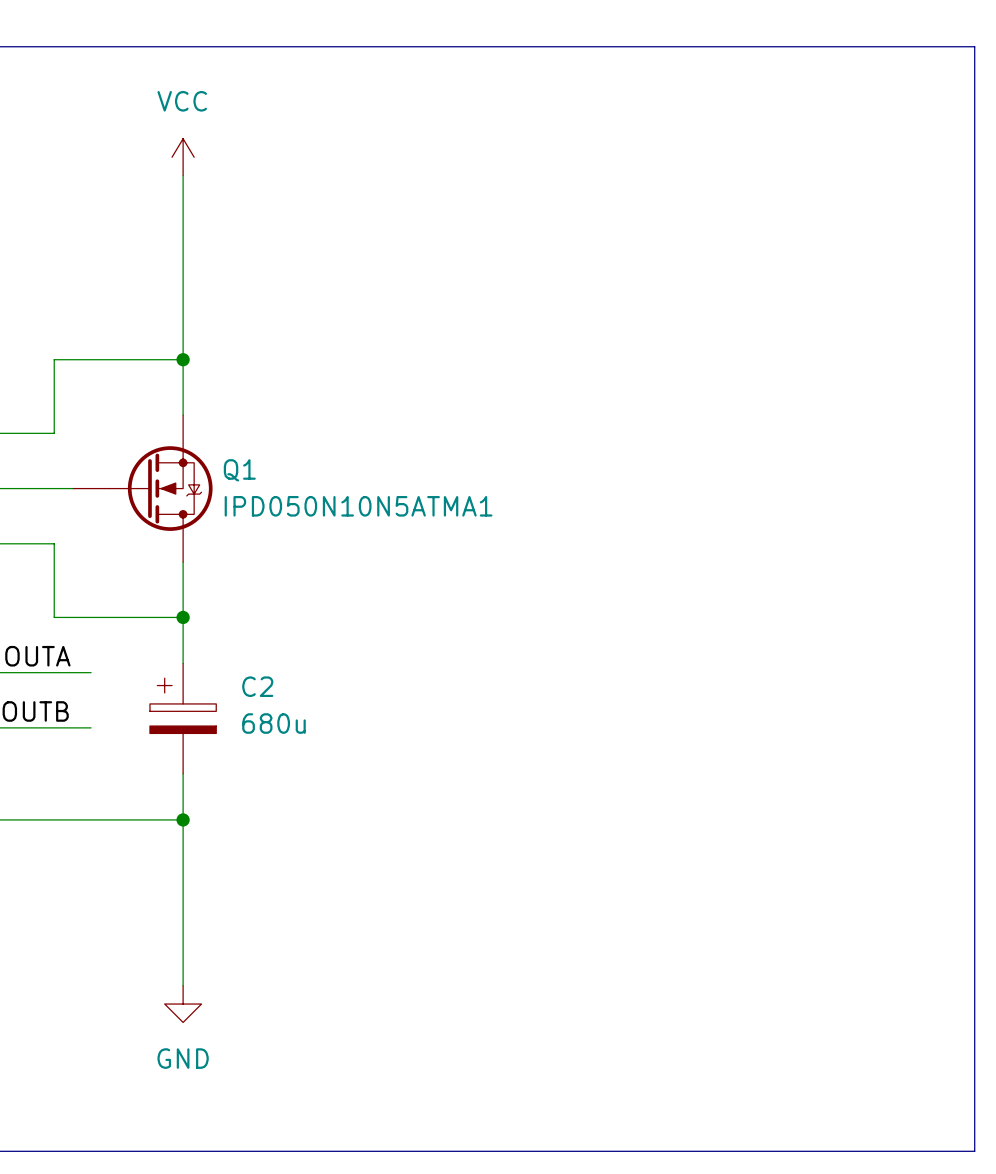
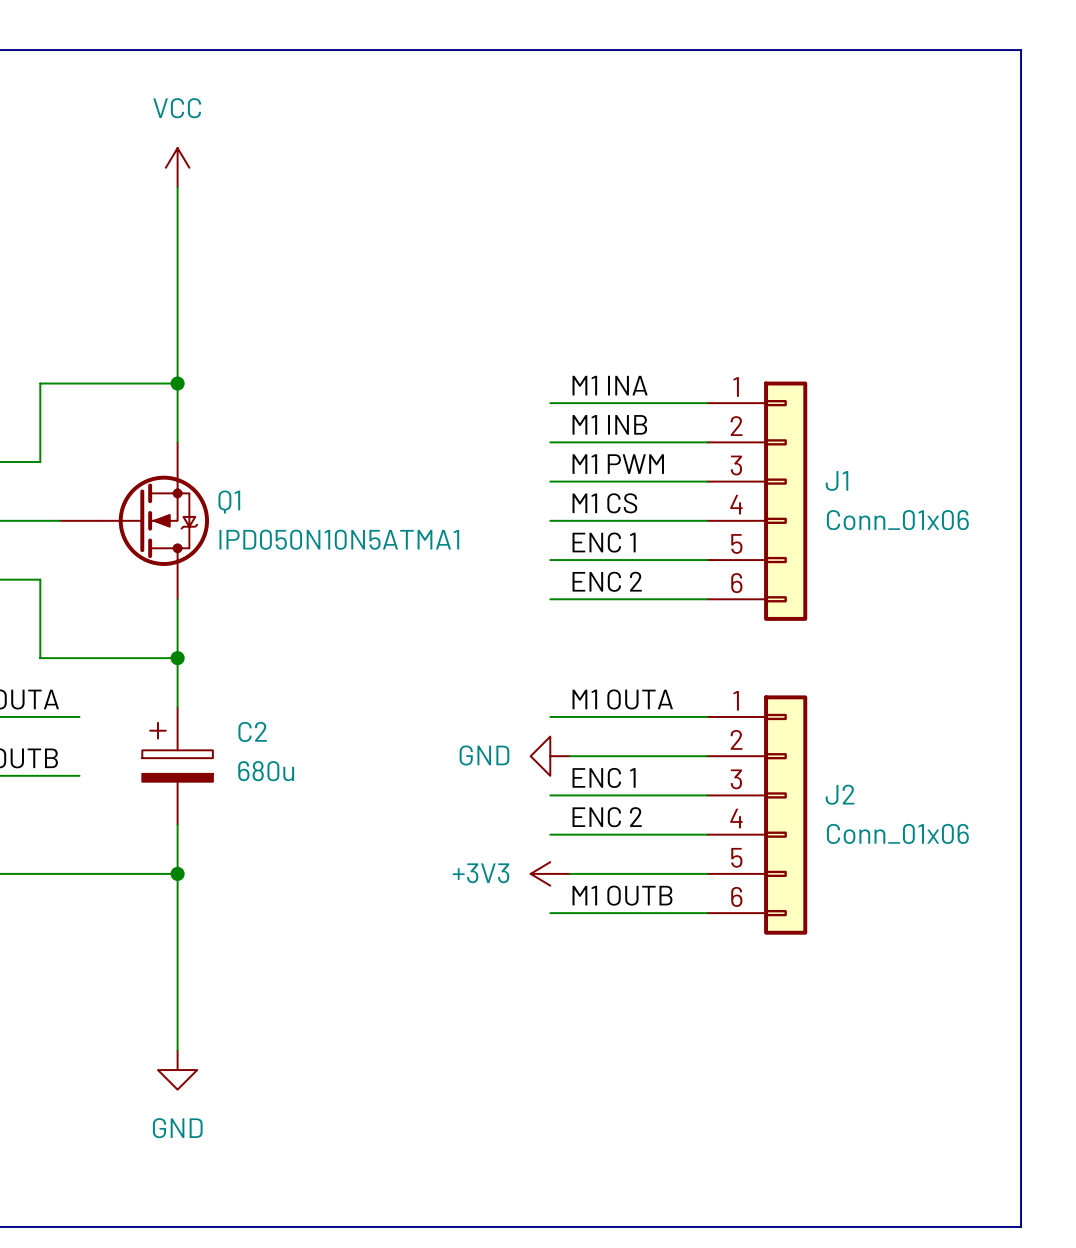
label: none -> M1 INA (610, 385)
wire: none -> (550, 403) (707, 403)
label: none -> M1 INB (609, 424)
wire: none -> (550, 442) (707, 442)
label: none -> M1 PWM (618, 464)
wire: none -> (550, 481) (707, 481)
J1: none -> Conn_01x06 (757, 501)
label: none -> M1 CS (604, 503)
wire: none -> (550, 520) (707, 520)
label: none -> ENC 1 (604, 542)
wire: none -> (550, 560) (707, 560)
label: none -> ENC 2 (607, 581)
wire: none -> (550, 599) (707, 599)
label: none -> M1 OUTA (622, 699)
wire: none -> (550, 716) (707, 716)
power symbol: none -> GND (550, 756)
wire: none -> (569, 756) (707, 756)
label: none -> ENC 1 (604, 777)
wire: none -> (550, 795) (707, 795)
J2: none -> Conn_01x06 (757, 815)
label: none -> ENC 2 (607, 817)
wire: none -> (550, 834) (707, 834)
power symbol: none -> +3V3 (550, 873)
wire: none -> (569, 873) (707, 873)
label: none -> M1 OUTB (622, 895)
wire: none -> (550, 913) (707, 913)

